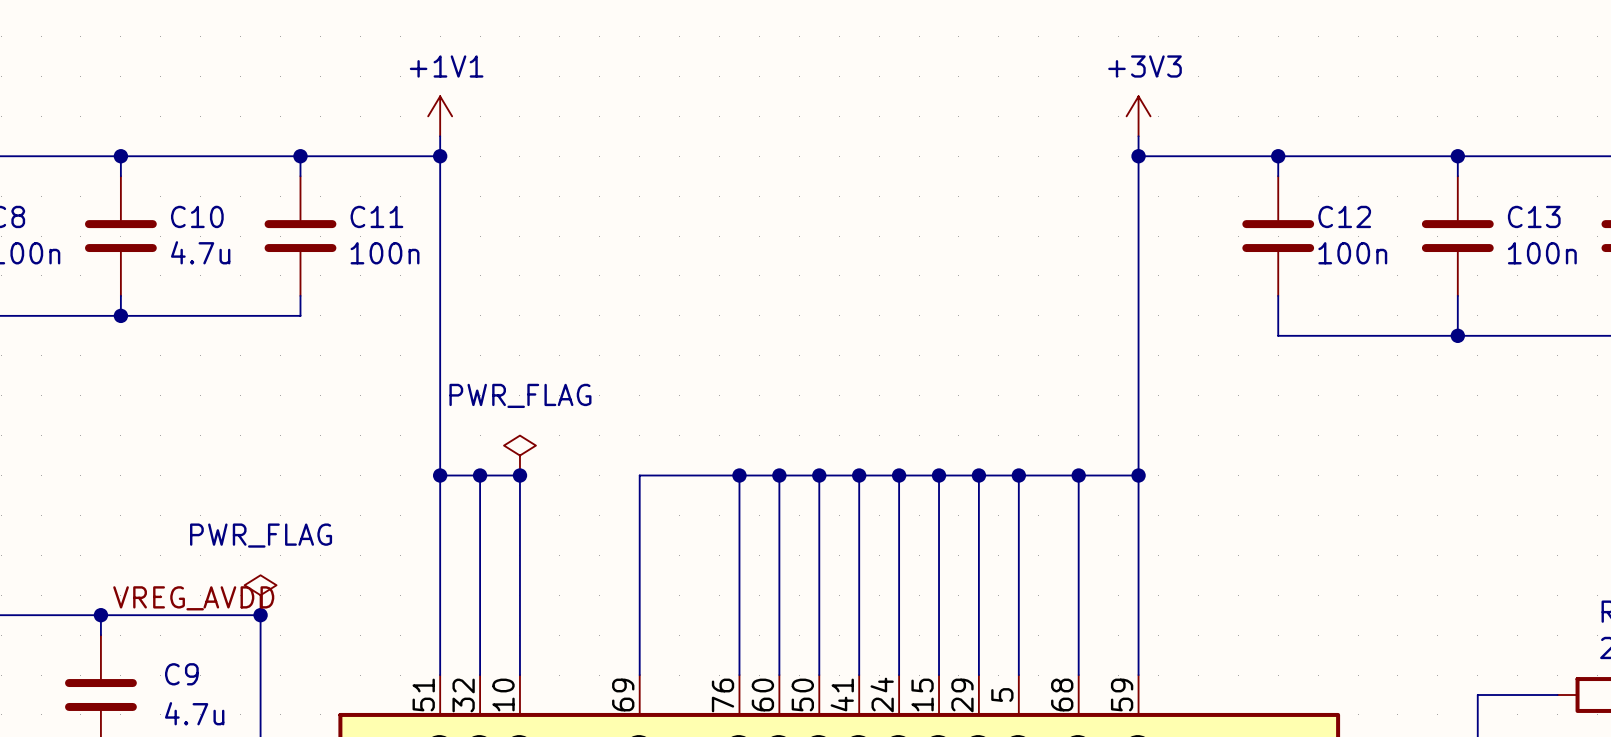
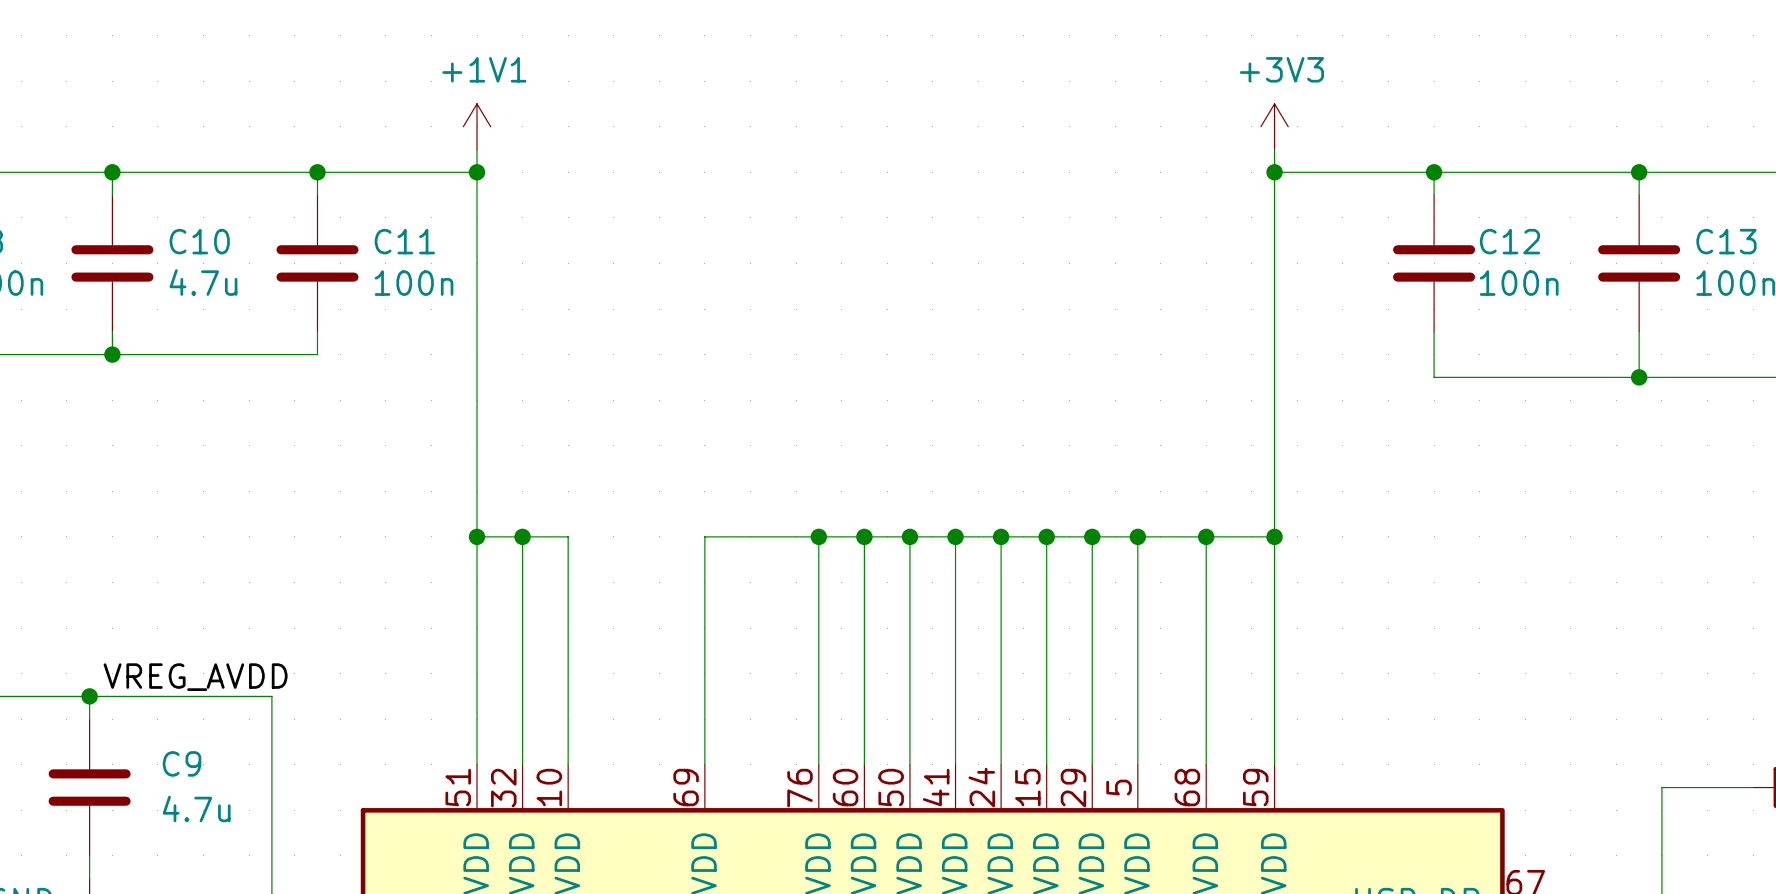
power symbol: PWR_FLAG (519, 455) -> none
junction: (519, 475) -> none
power symbol: PWR_FLAG (260, 595) -> none
junction: (260, 615) -> none

